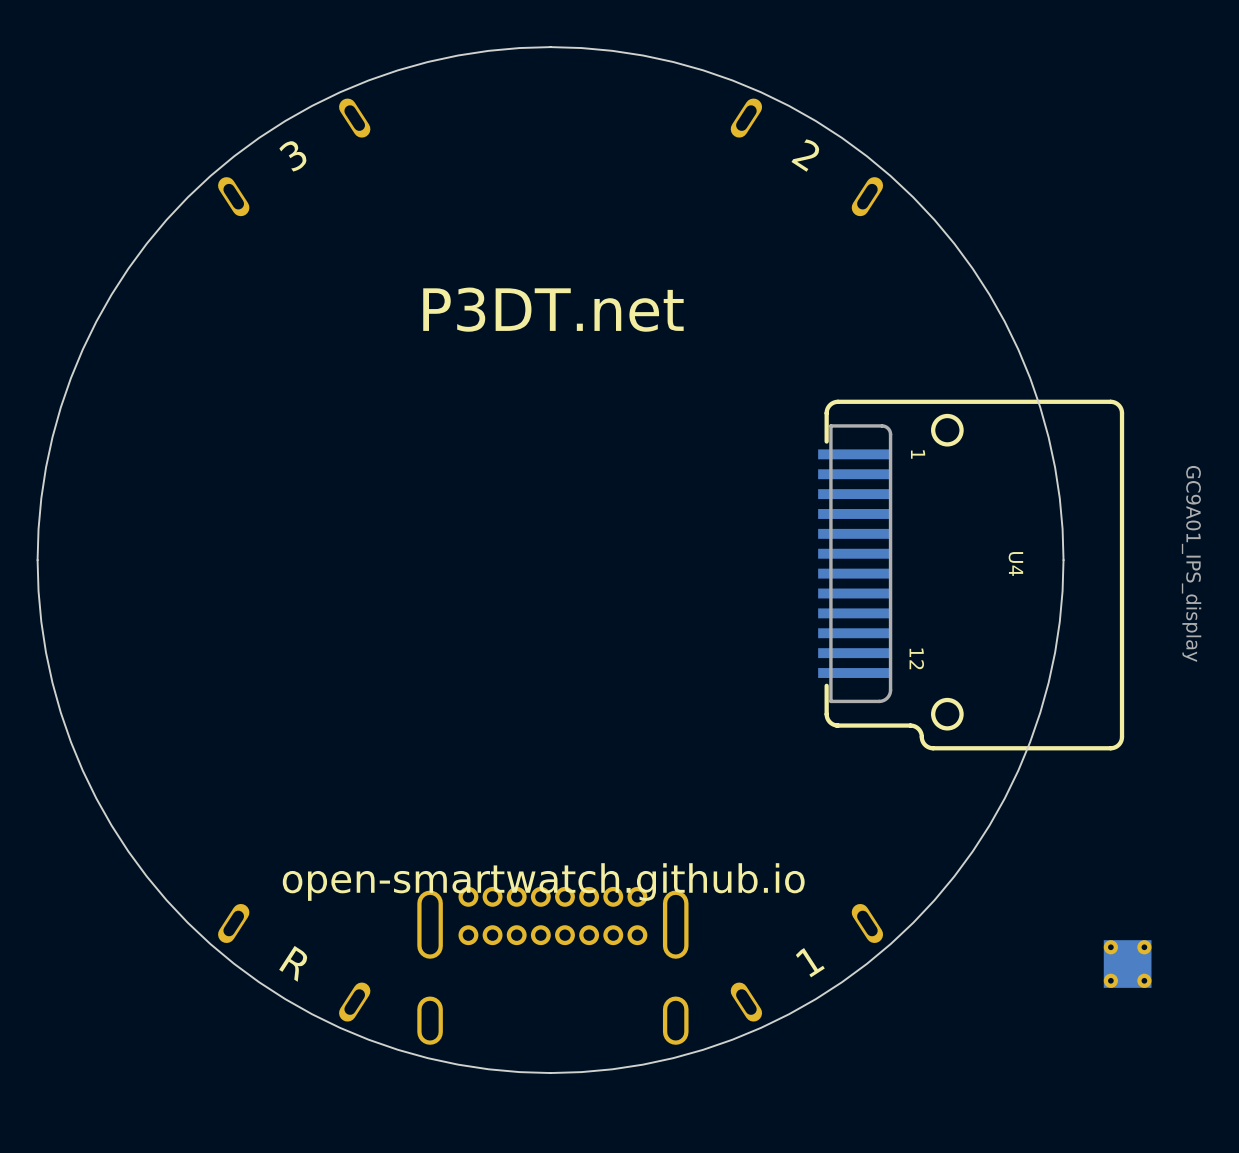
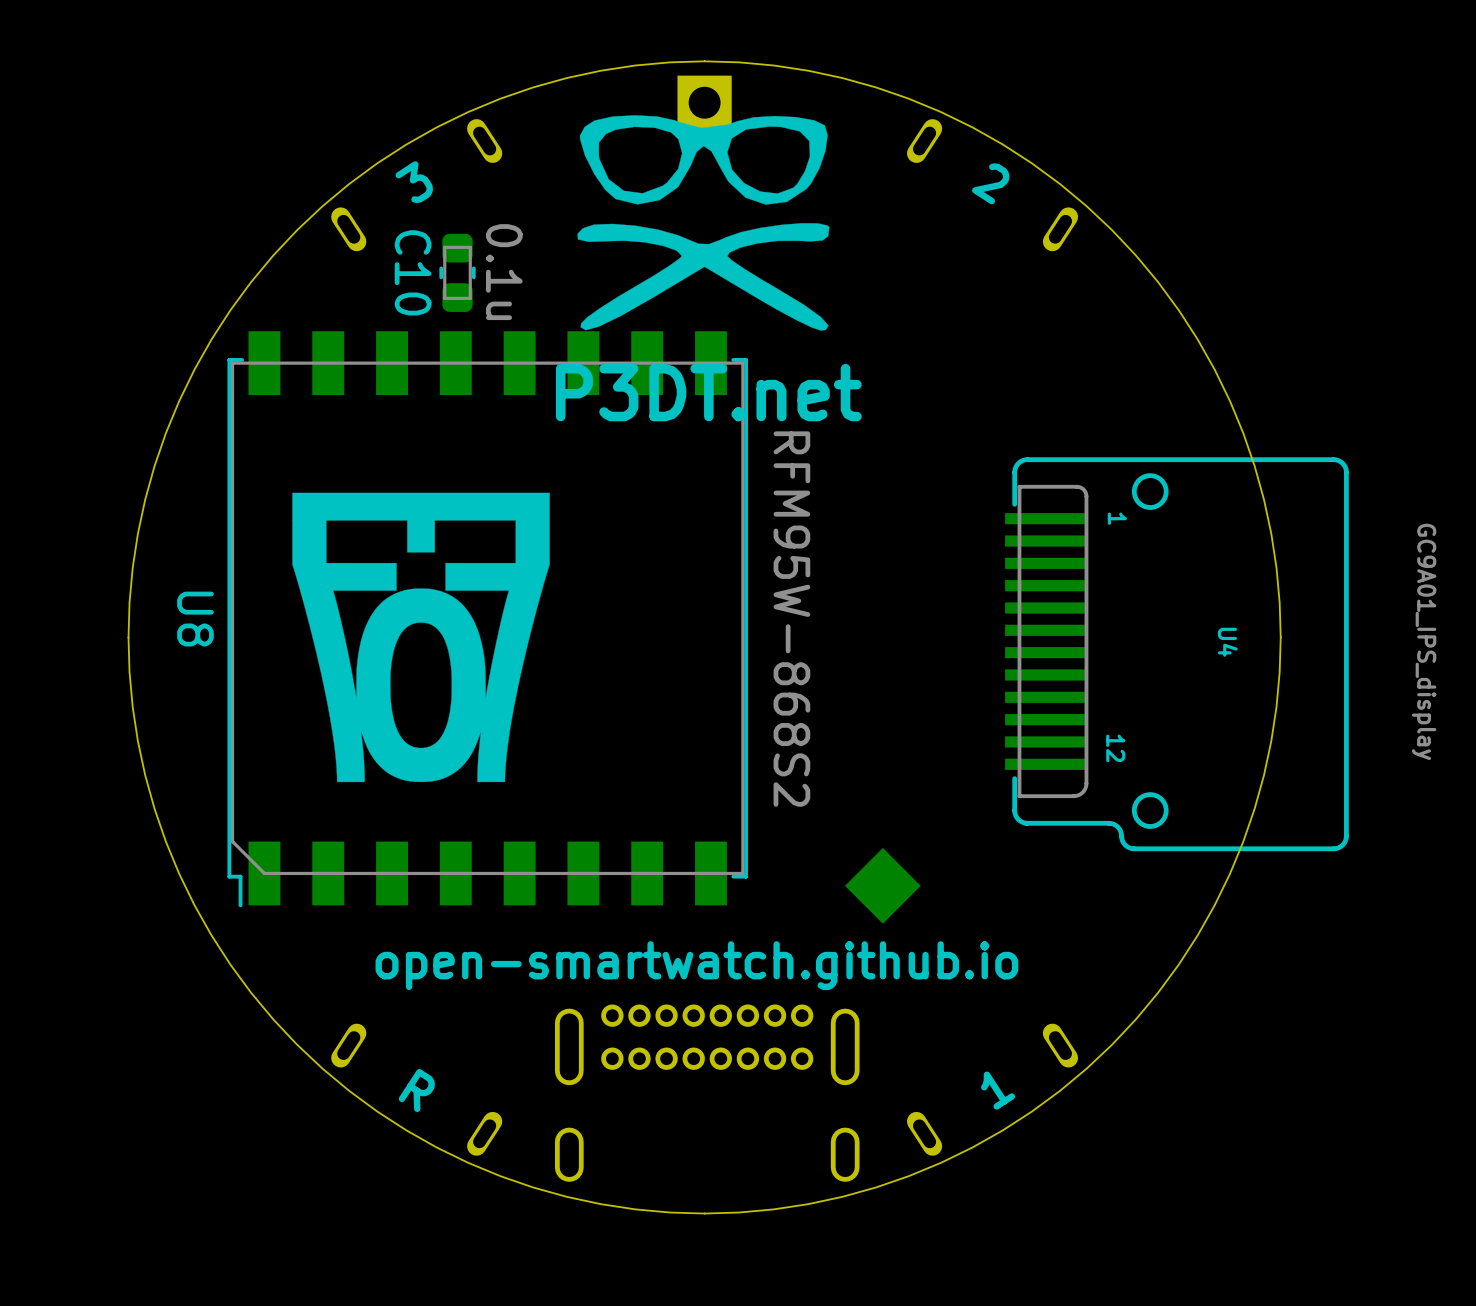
part: none -> (704, 102)
drawing: none -> [577, 115, 830, 331]
C10: none -> 0.1u (457, 272)
text position: P3DT.net (553, 309) -> P3DT.net (708, 392)
drawing: none -> [292, 492, 550, 783]
U8: none -> RFM95W-868S2 (487, 619)
part: none -> (882, 885)
text position: open-smartwatch.github.io (543, 882) -> open-smartwatch.github.io (696, 965)
part: (1127, 964) -> none

